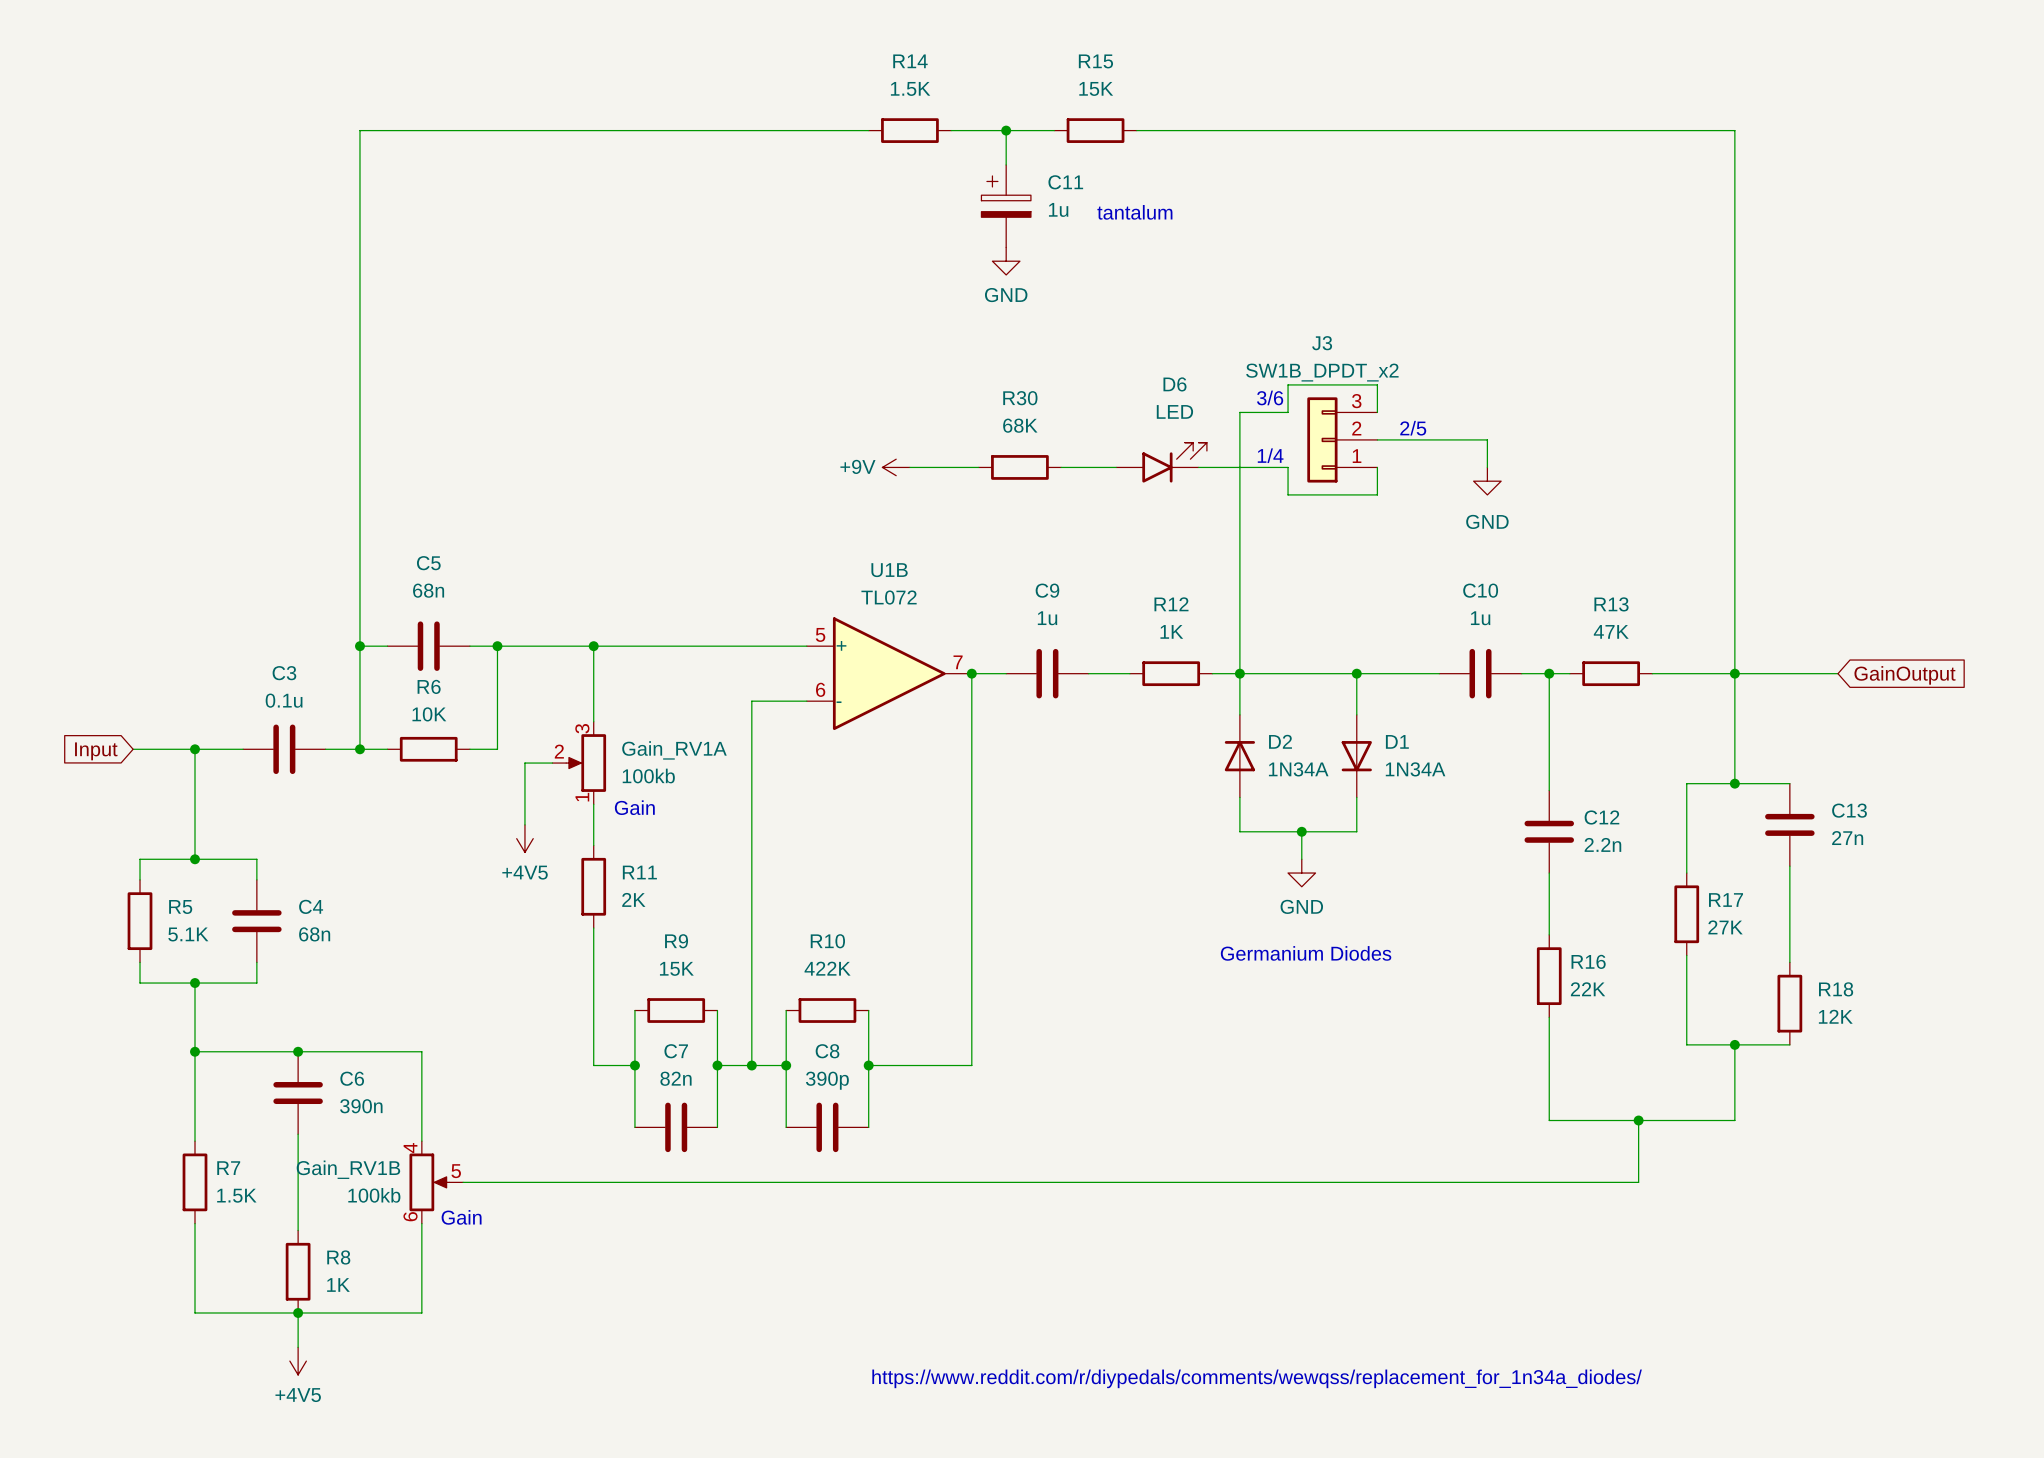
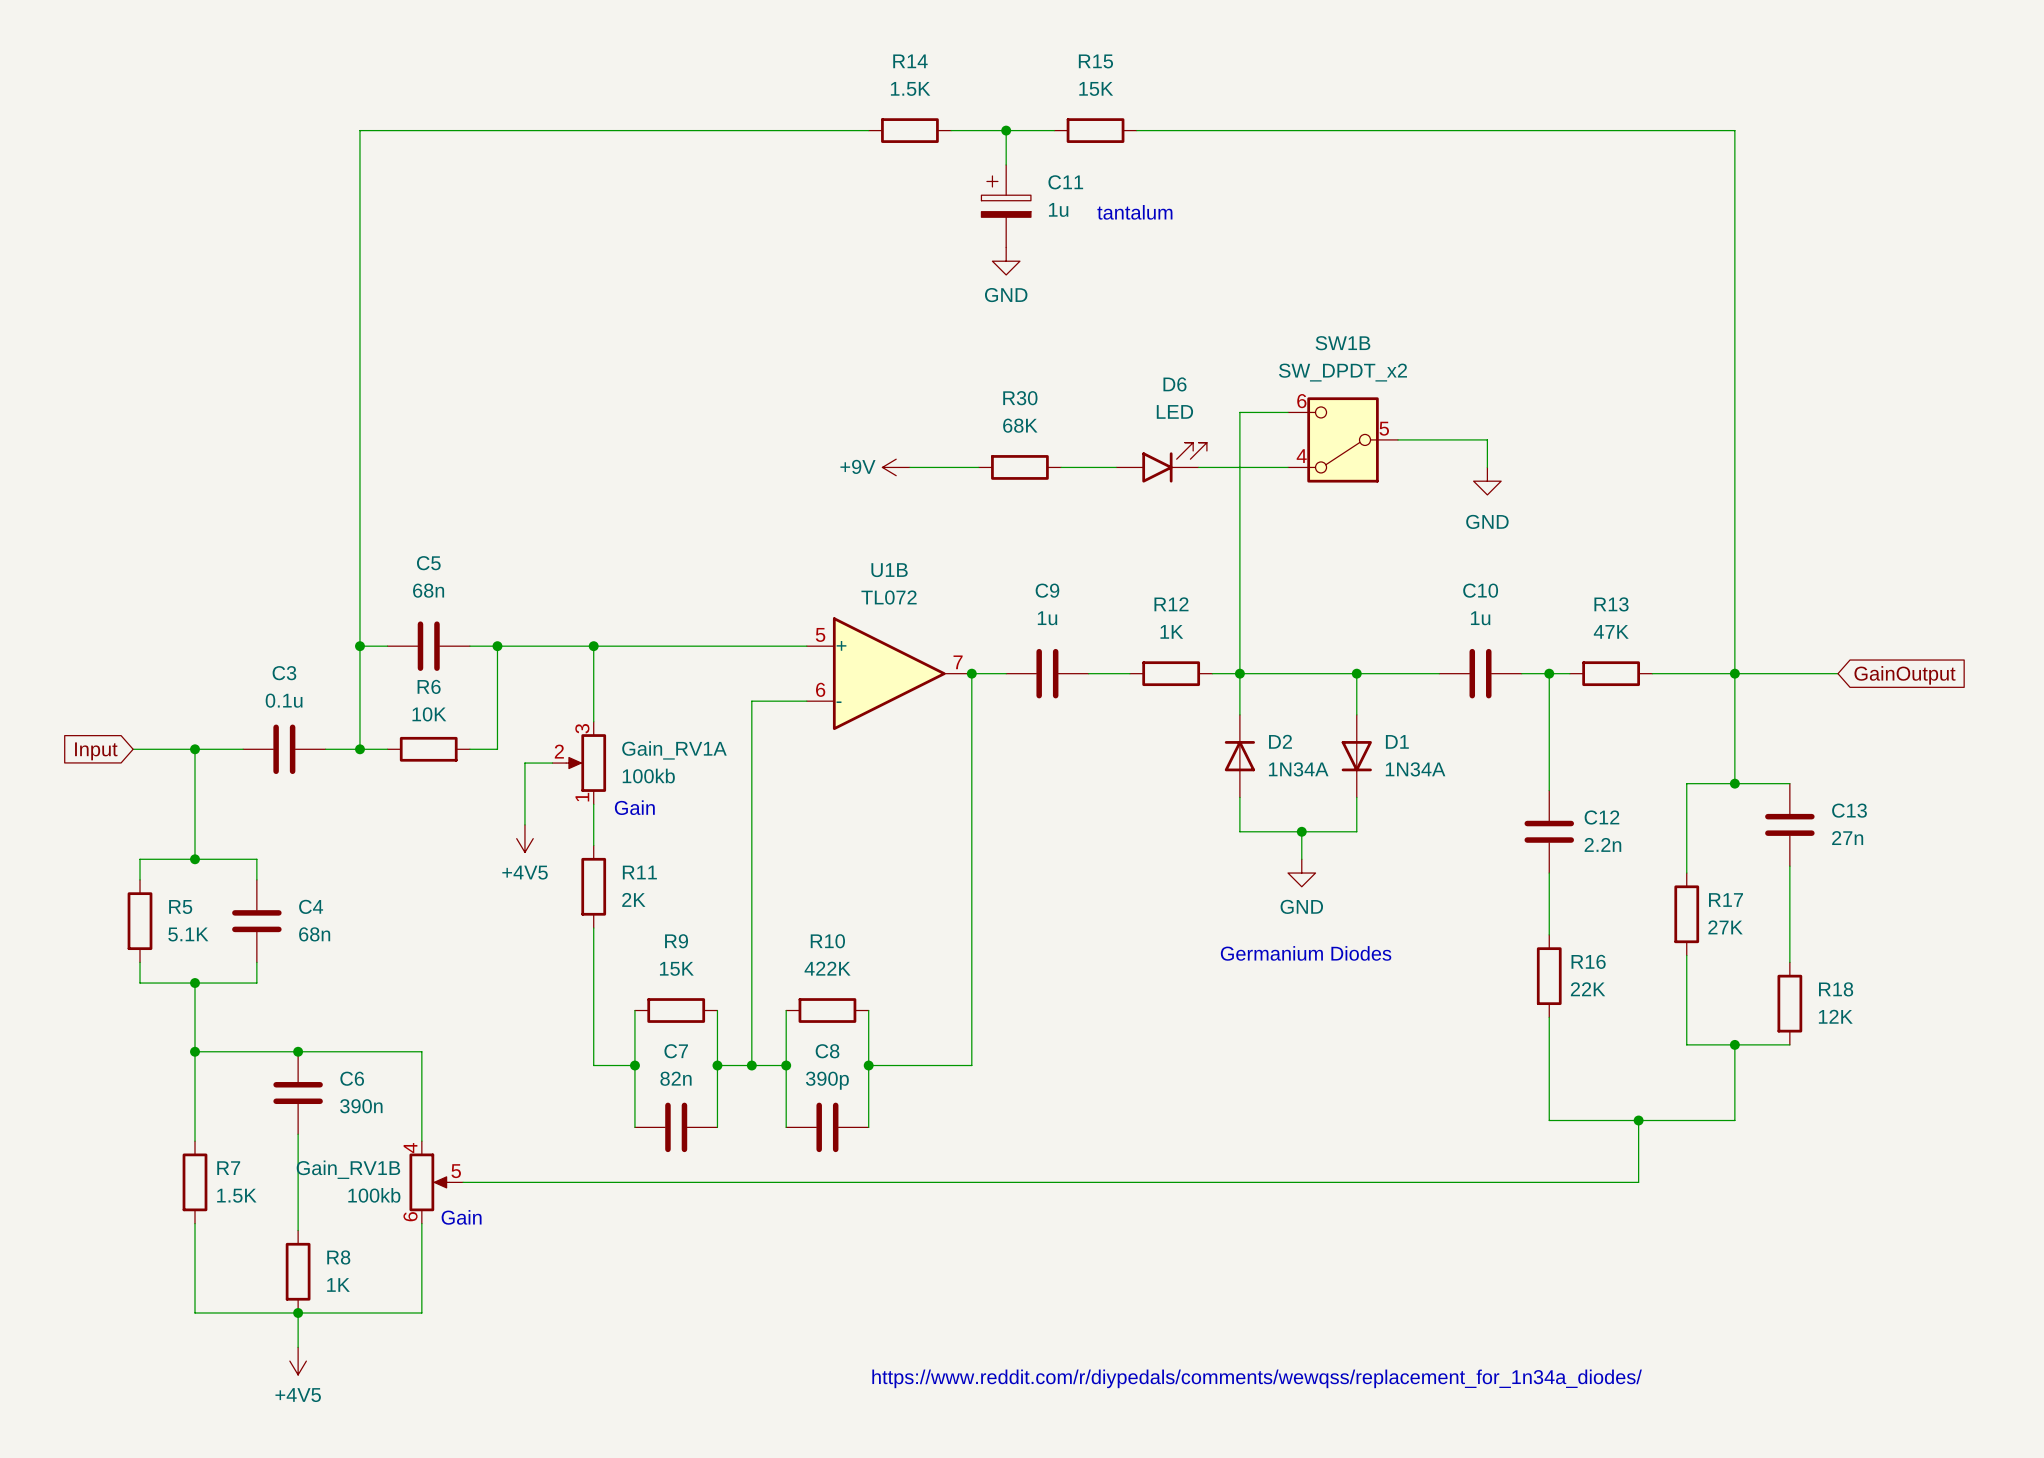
text: 3/6 (1270, 397) -> none
wire: (1288, 412) (1288, 384) (1377, 384) (1377, 412) -> none
text: 2/5 (1413, 428) -> none
J3: SW1B_DPDT_x2 (1342, 439) -> none
SW1B: none -> SW_DPDT_x2 (1343, 439)
text: 1/4 (1270, 455) -> none
wire: (1288, 467) (1288, 494) (1377, 494) (1377, 467) -> none

